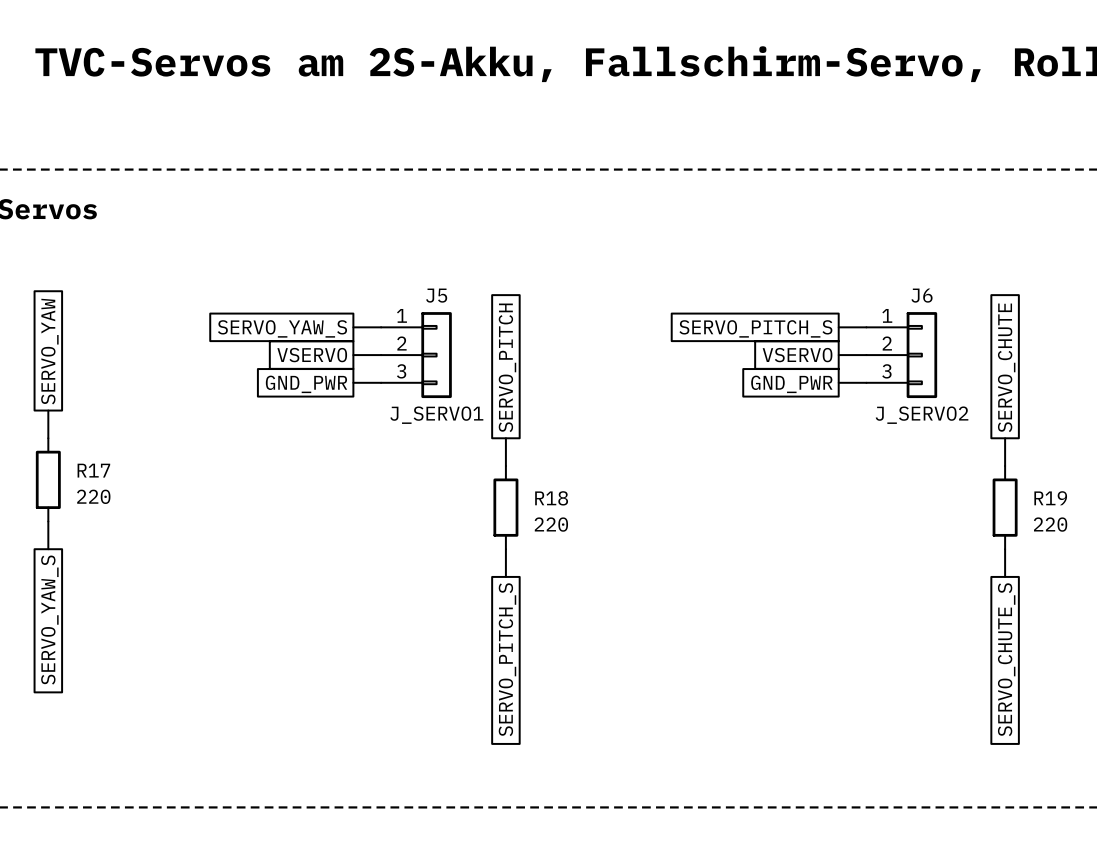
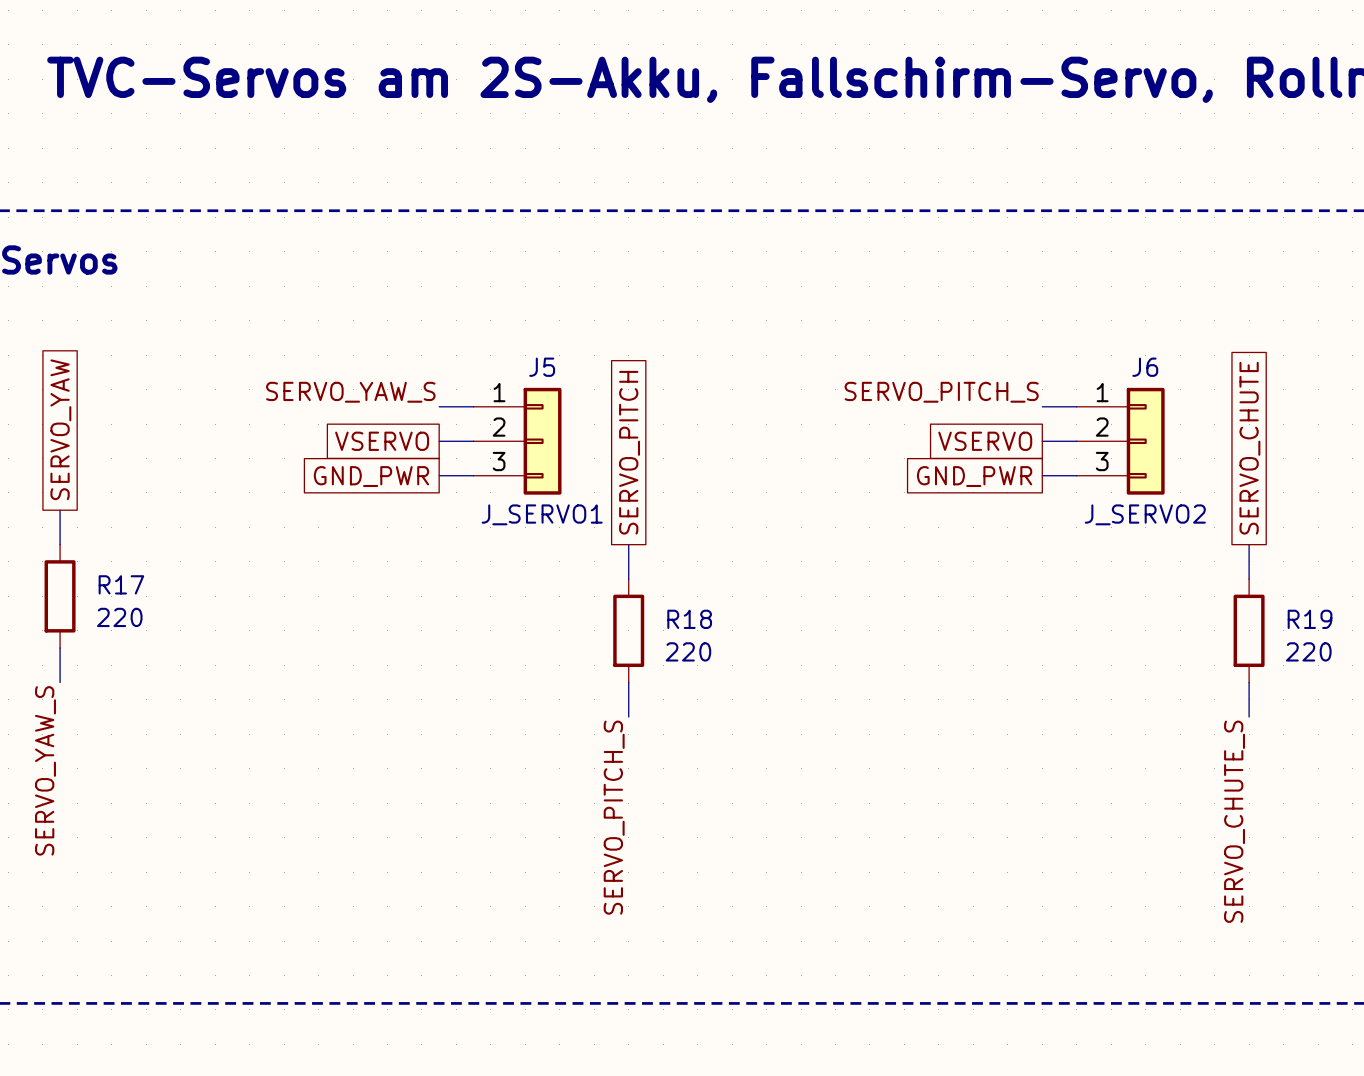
label: none -> SERVO_YAW_S (350, 392)
label: none -> SERVO_PITCH_S (941, 392)
global label: SERVO_YAW_S (282, 328) -> none
global label: SERVO_PITCH_S (755, 328) -> none
label: none -> SERVO_YAW_S (45, 770)
global label: SERVO_YAW_S (49, 620) -> none
label: none -> SERVO_PITCH_S (614, 817)
label: none -> SERVO_CHUTE_S (1234, 821)
global label: SERVO_PITCH_S (507, 659) -> none
global label: SERVO_CHUTE_S (1006, 659) -> none

